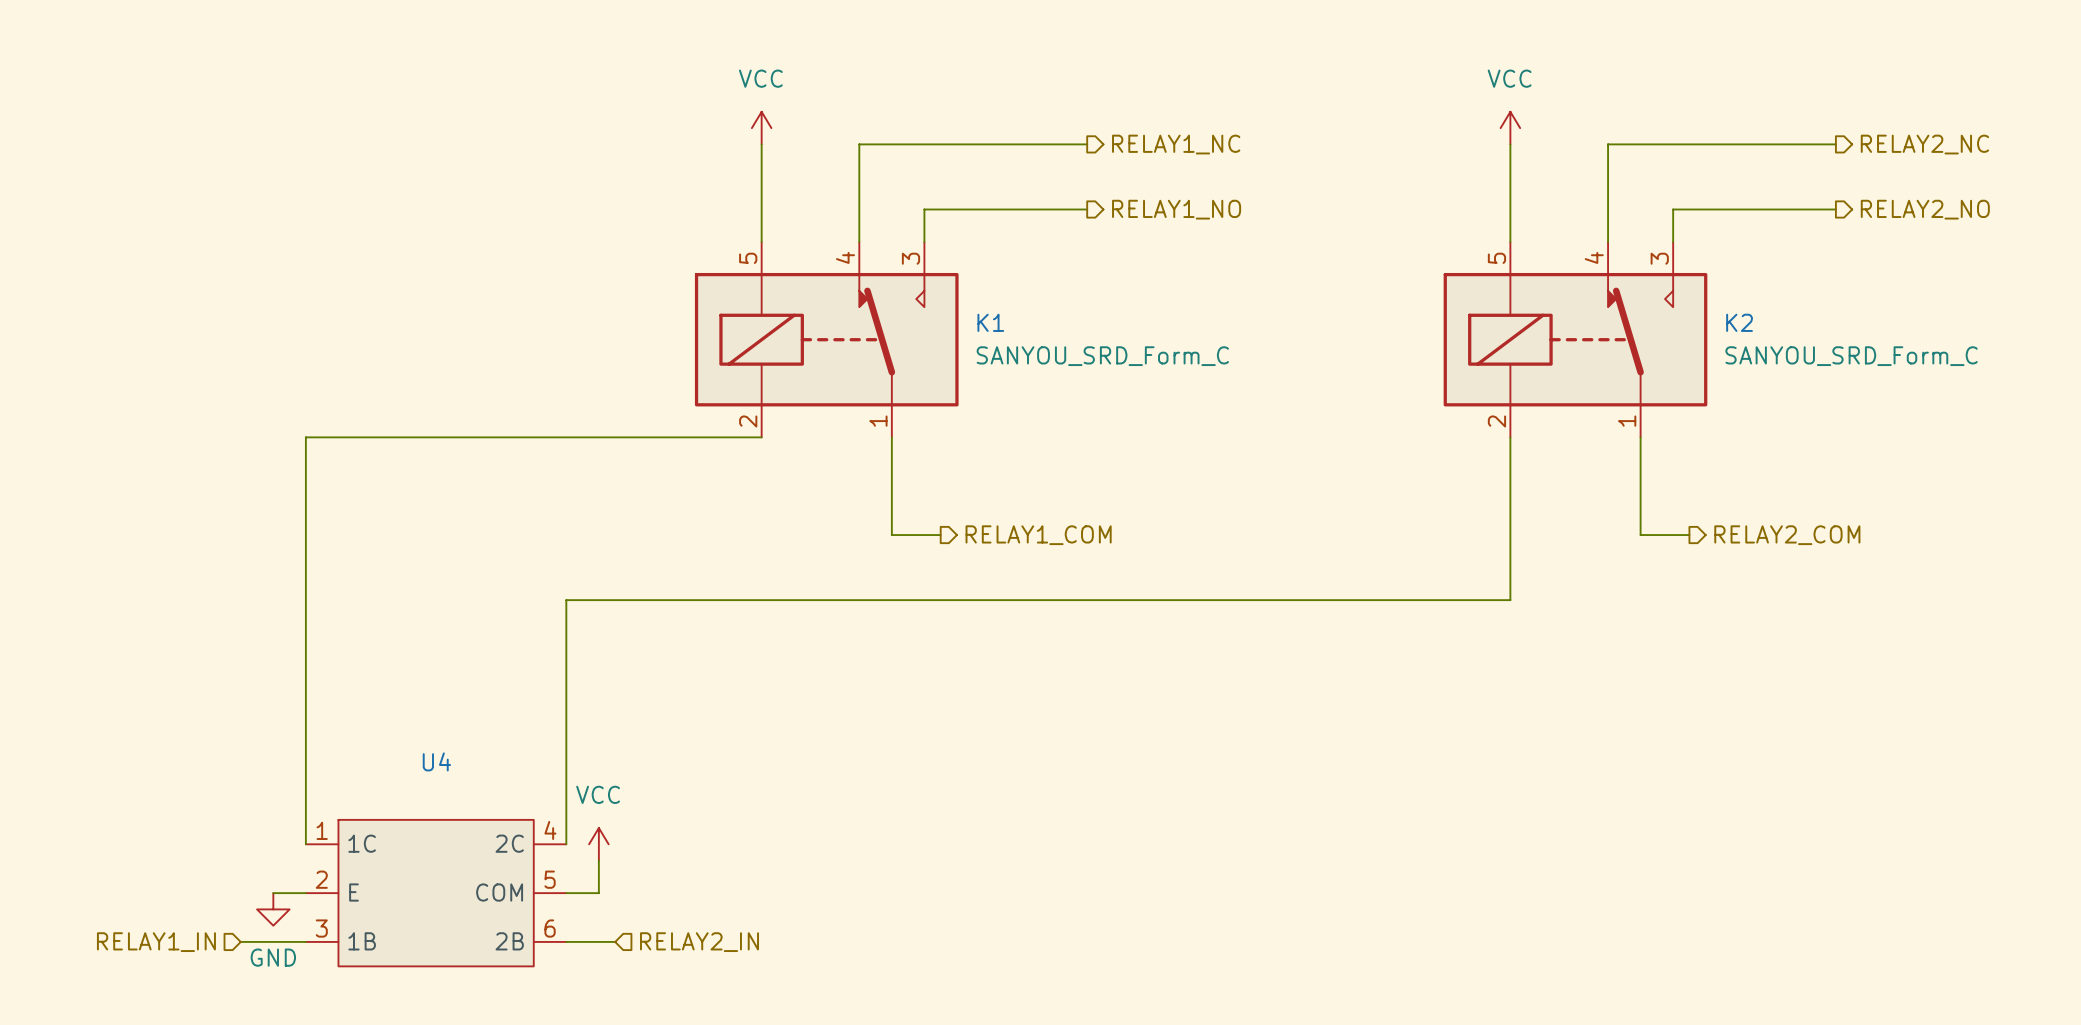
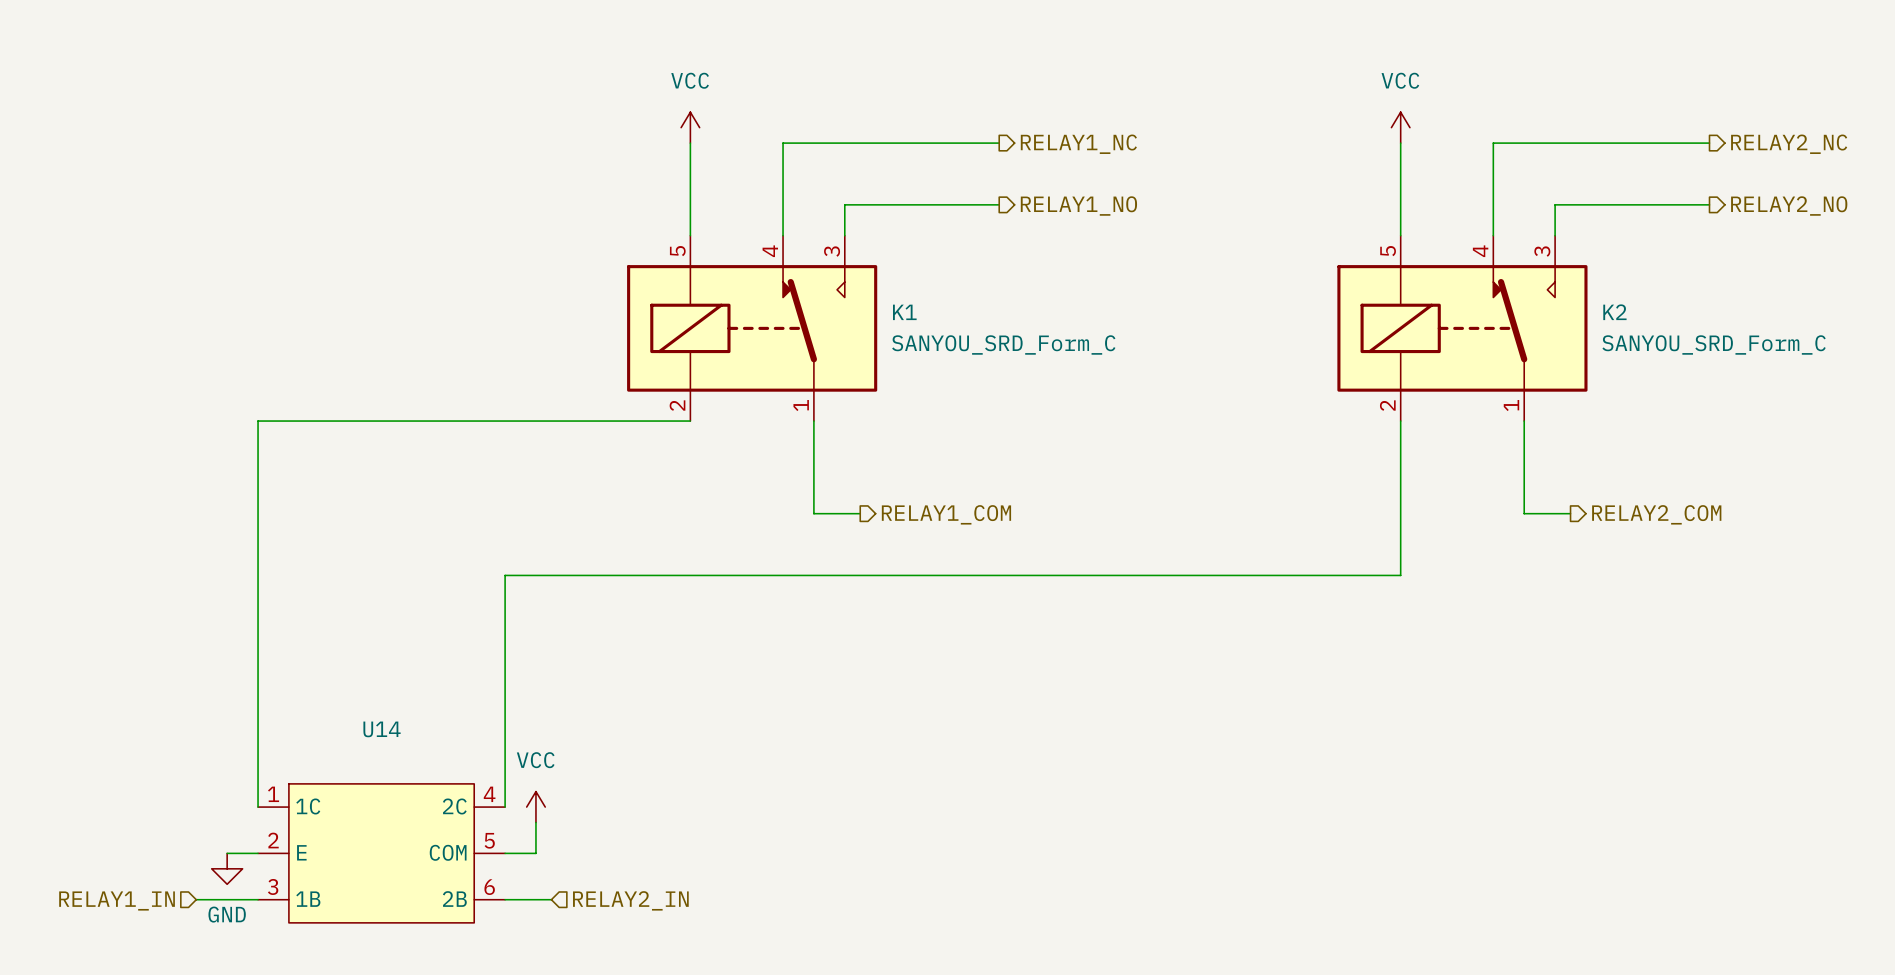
U4 name: U4 (436, 761) -> U14 (382, 729)

